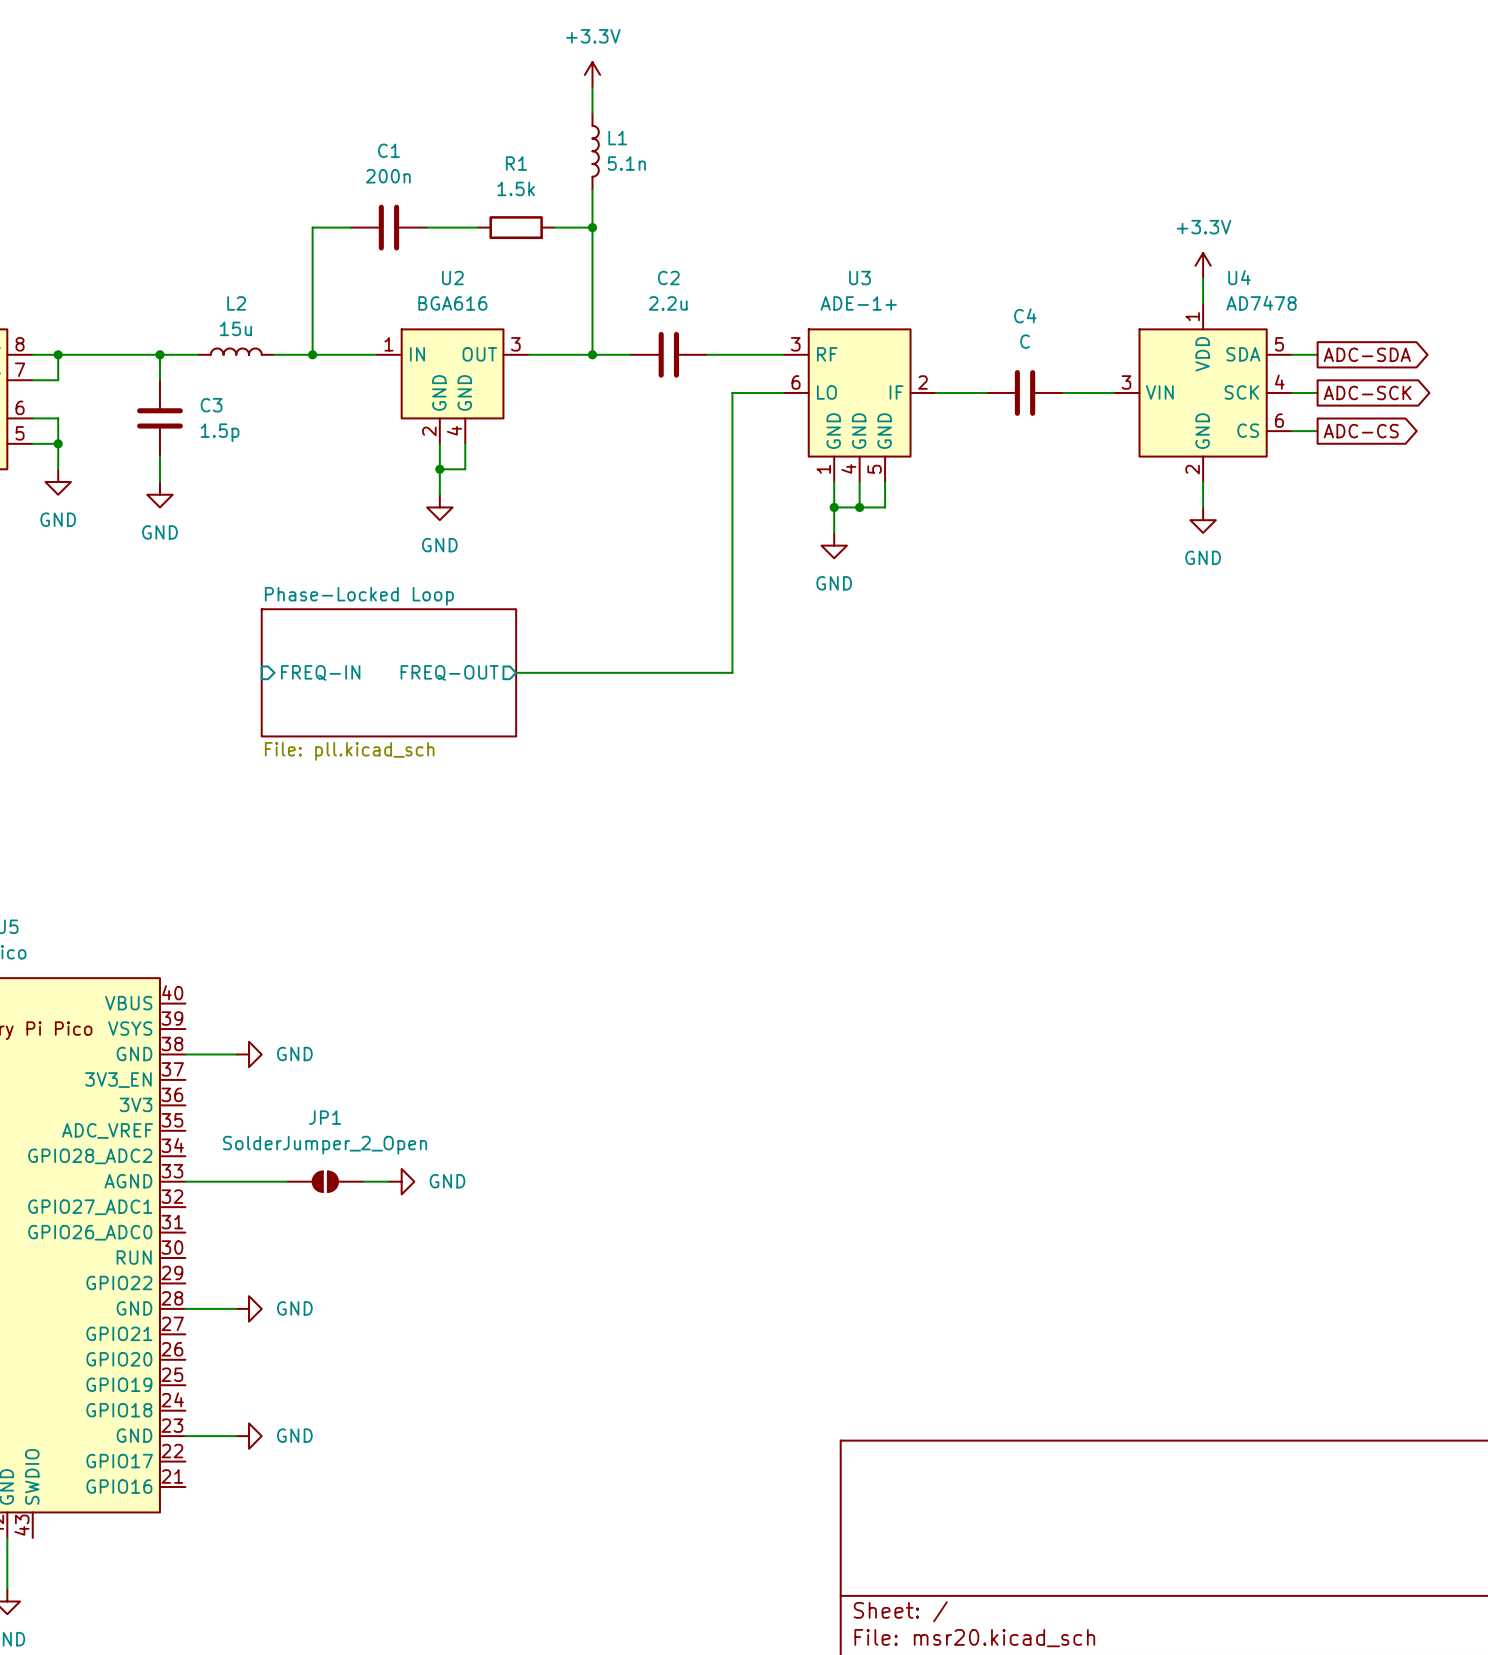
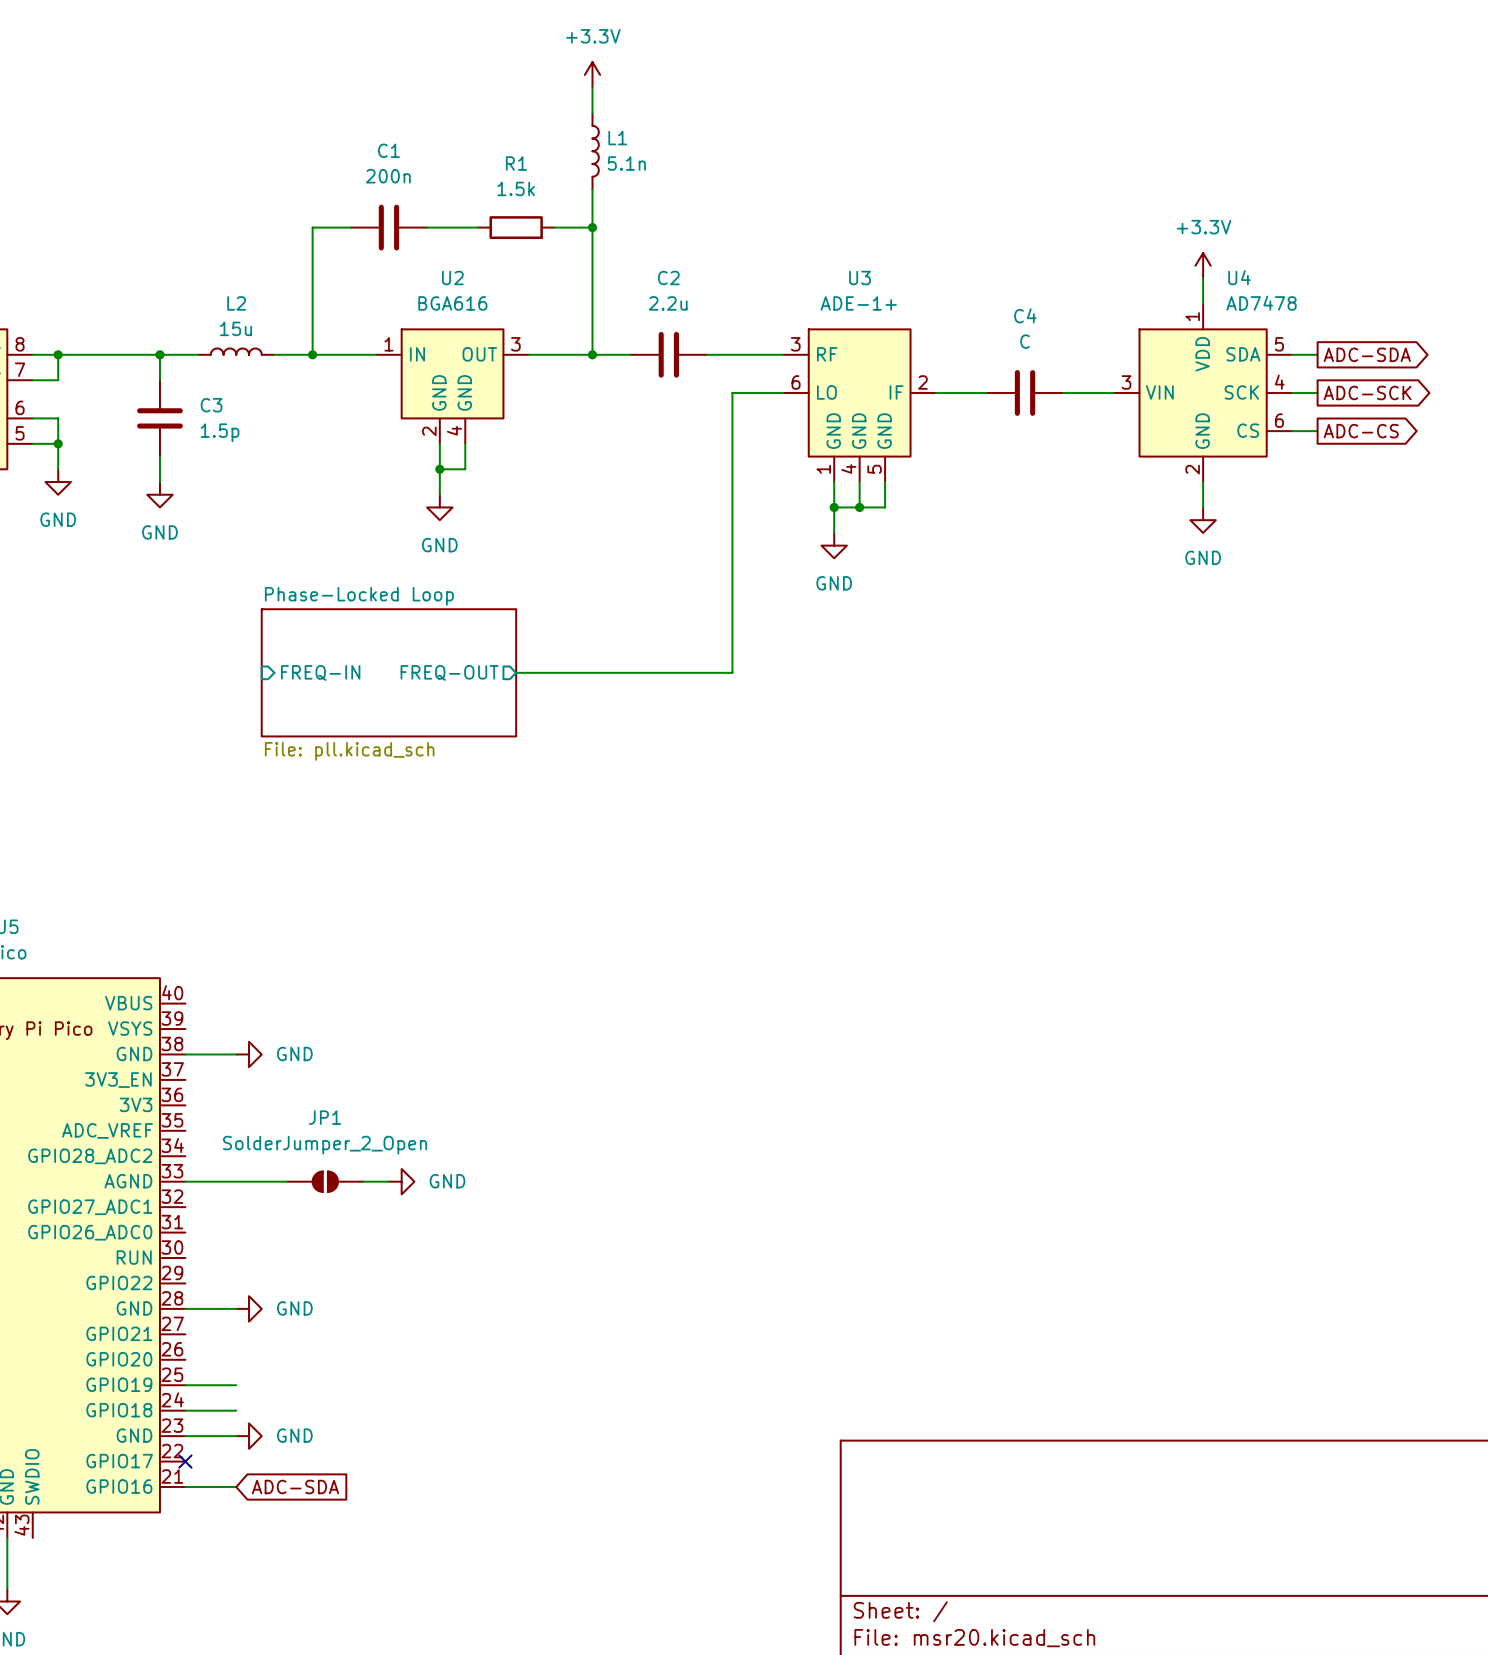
wire: none -> (185, 1385) (236, 1385)
wire: none -> (185, 1410) (236, 1410)
no-connect mark: none -> (185, 1461)
wire: none -> (185, 1487) (236, 1487)
global label: none -> ADC-SDA (295, 1487)

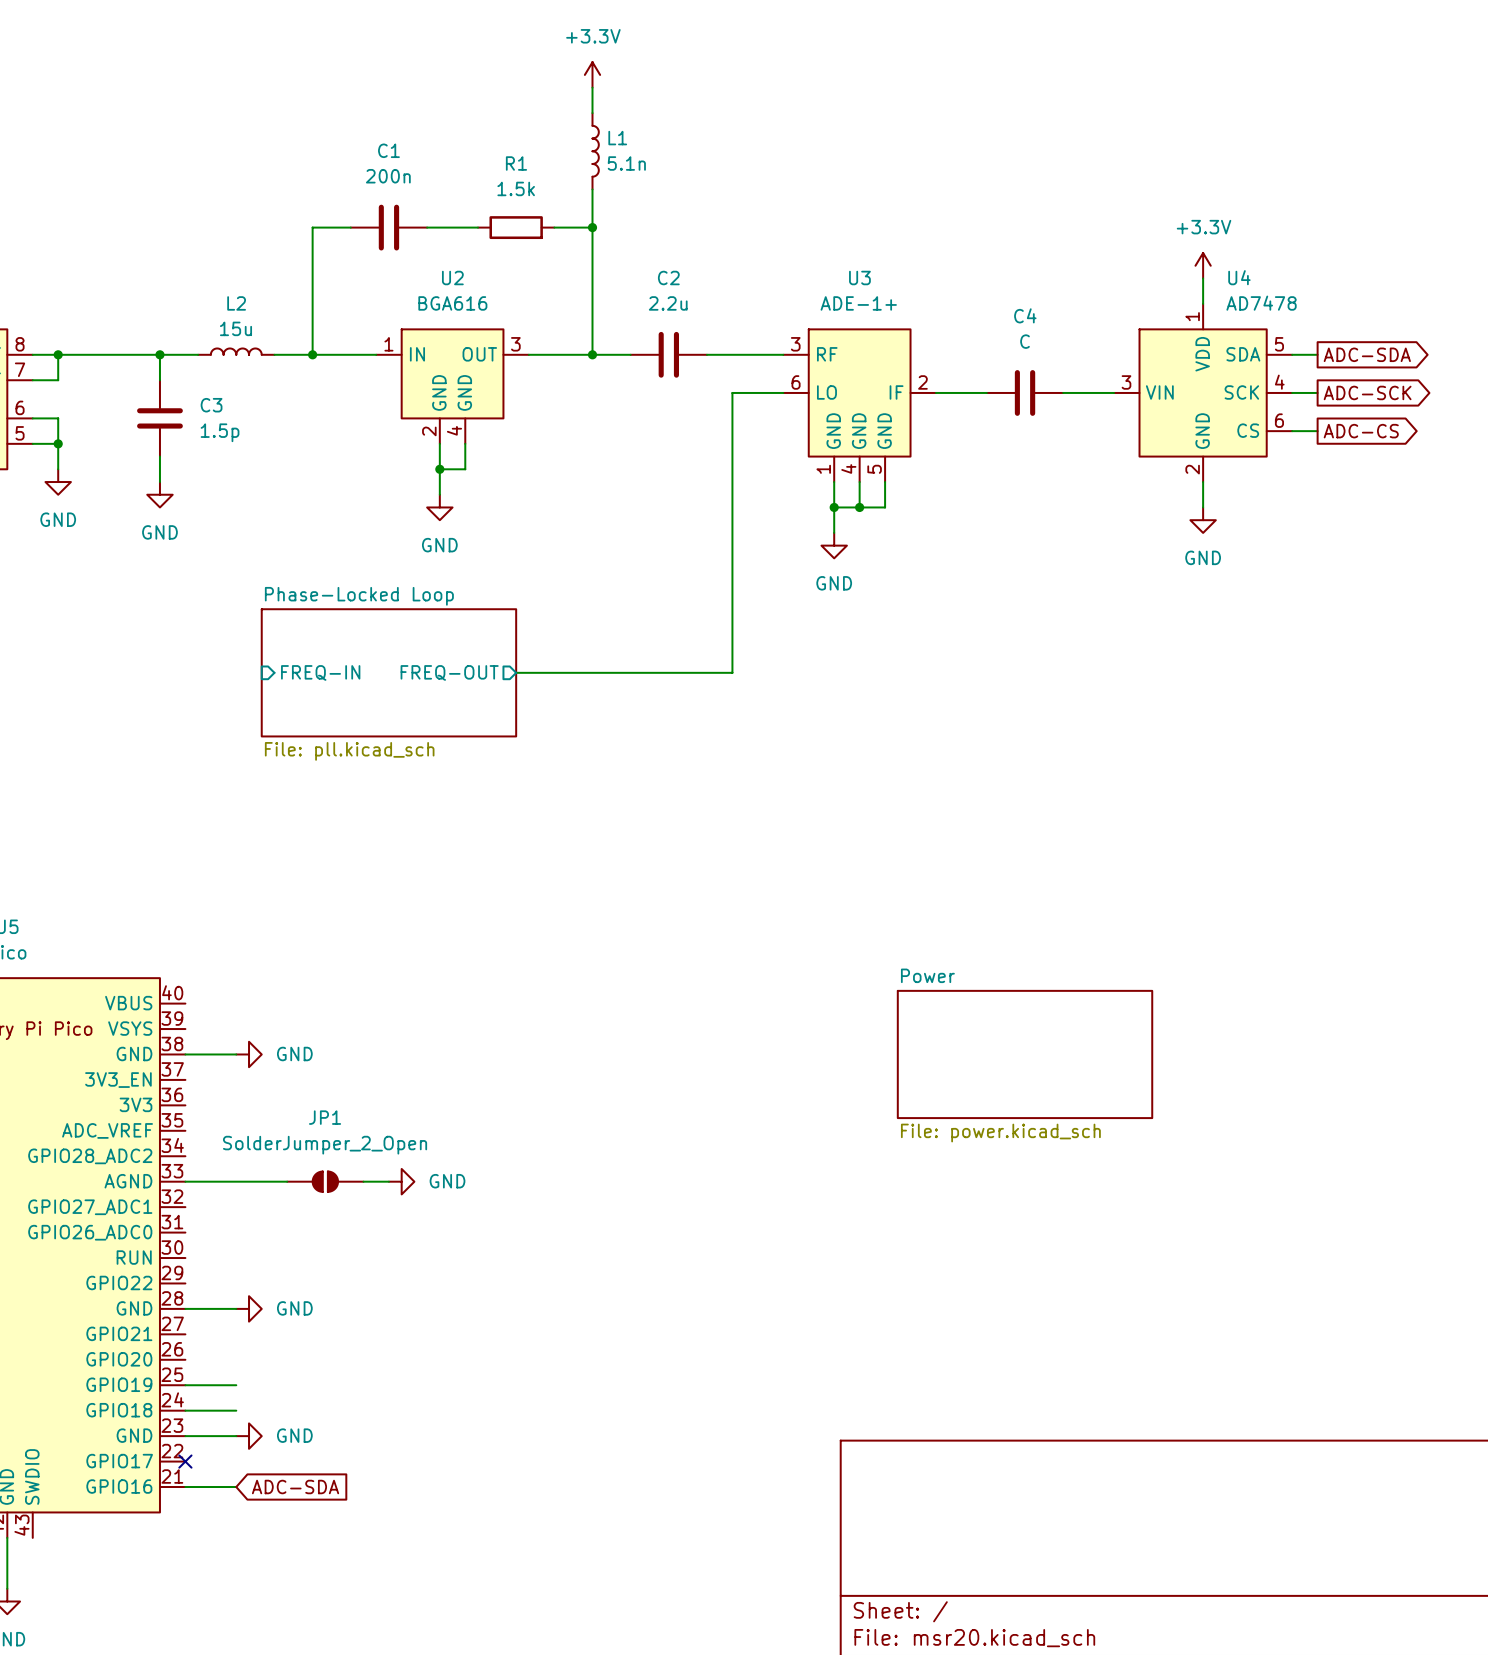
sheet Power: none -> File: power.kicad_sch (1025, 1054)

